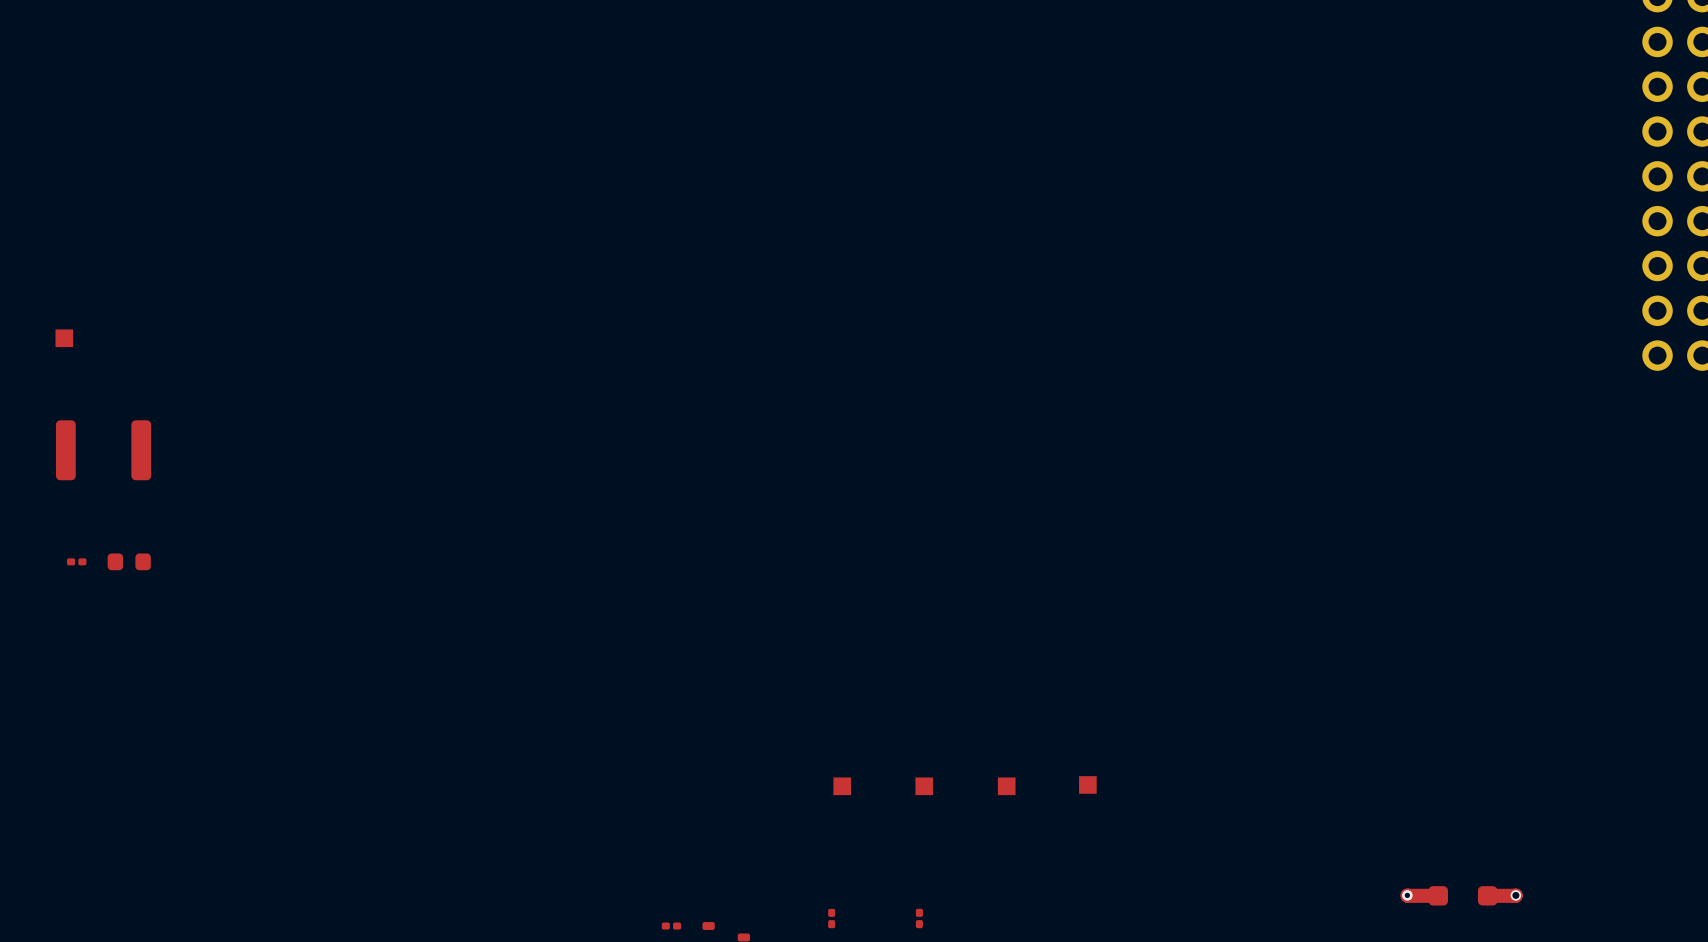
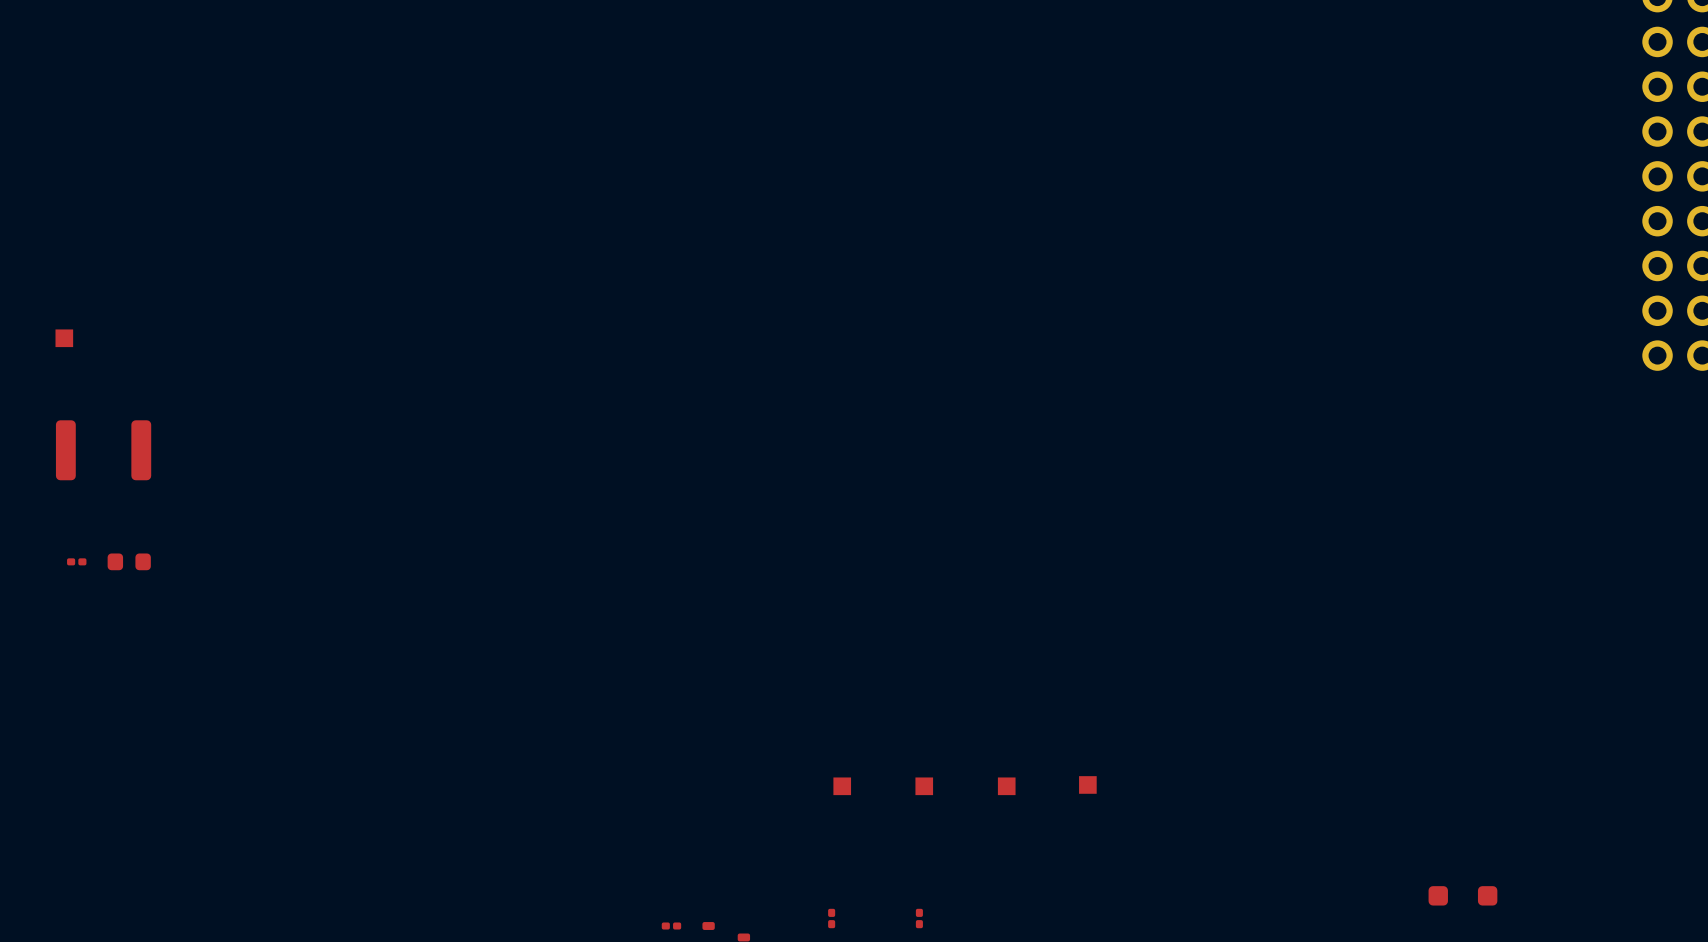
top track: (1407, 895) (1438, 895) -> none
via: (1407, 895) -> none
top track: (1515, 895) (1487, 895) -> none
via: (1515, 895) -> none

